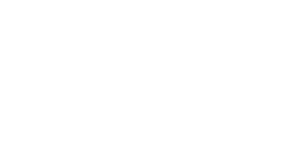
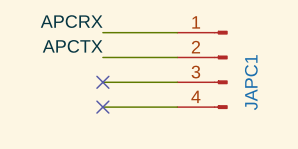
label: none -> APCRX (71, 21)
wire: none -> (102, 32) (177, 32)
label: none -> APCTX (72, 46)
wire: none -> (102, 57) (177, 57)
JAPC1: none -> (202, 69)
wire: none -> (102, 82) (177, 82)
no-connect mark: none -> (102, 82)
wire: none -> (102, 107) (177, 107)
no-connect mark: none -> (102, 107)

